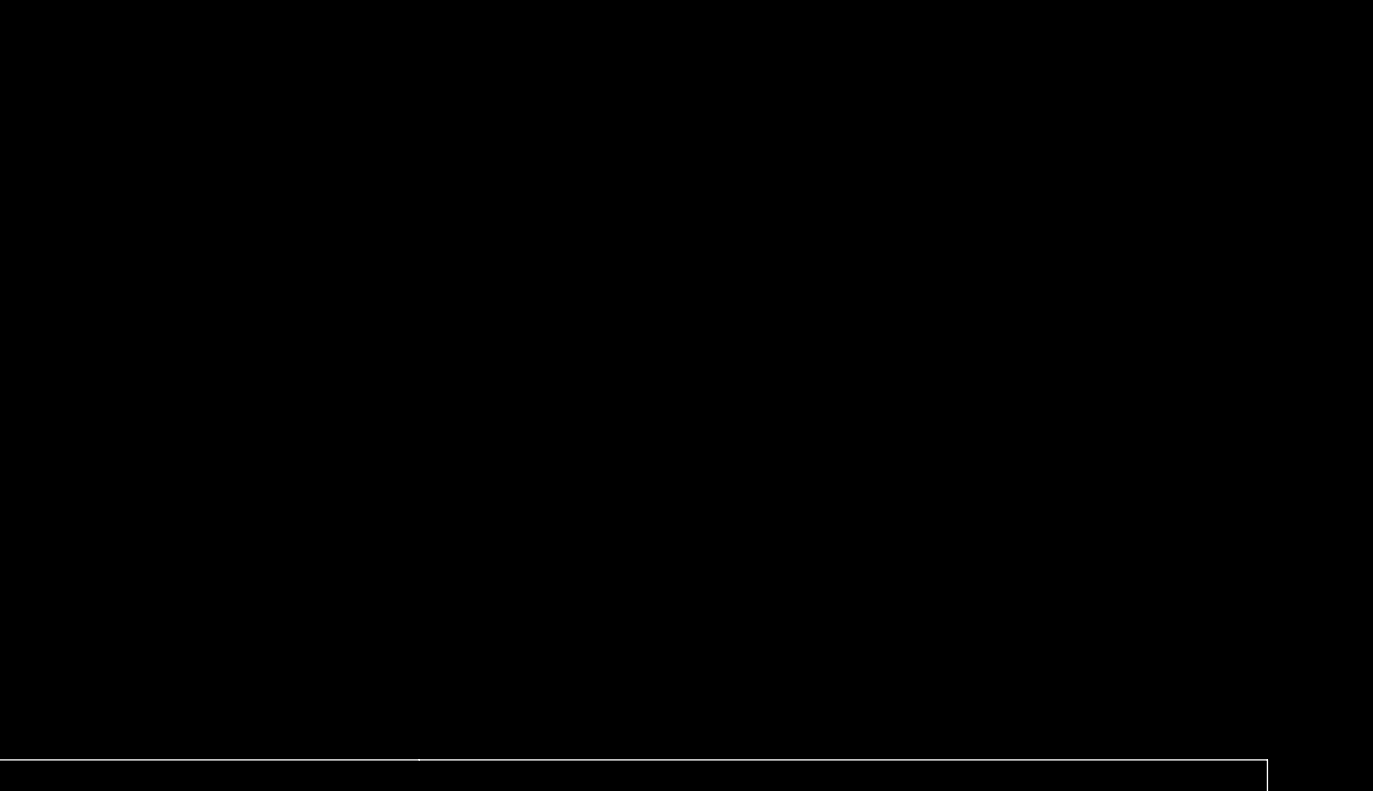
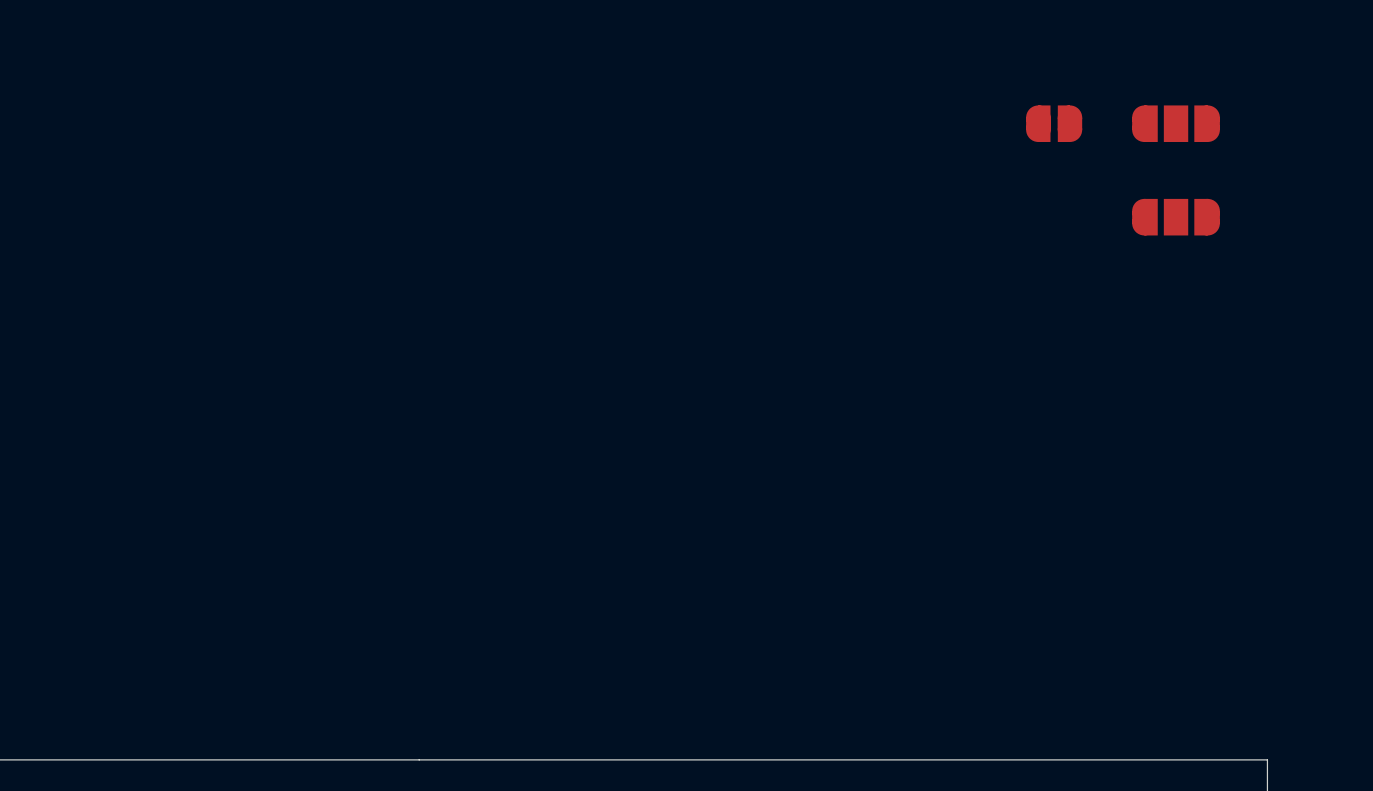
part: none -> (1054, 123)
part: none -> (1176, 123)
part: none -> (1176, 217)

